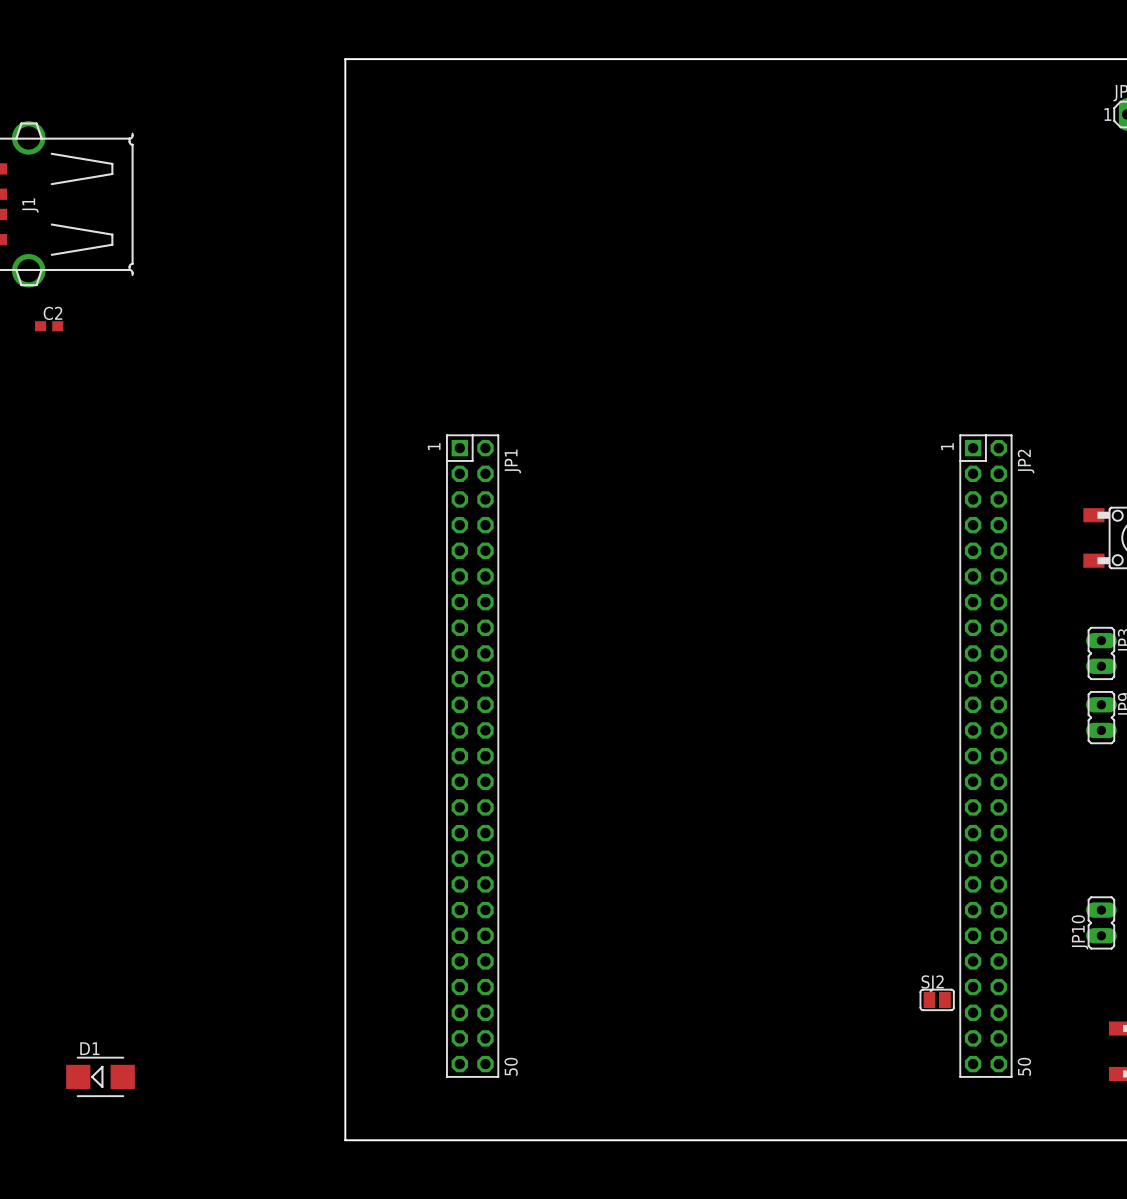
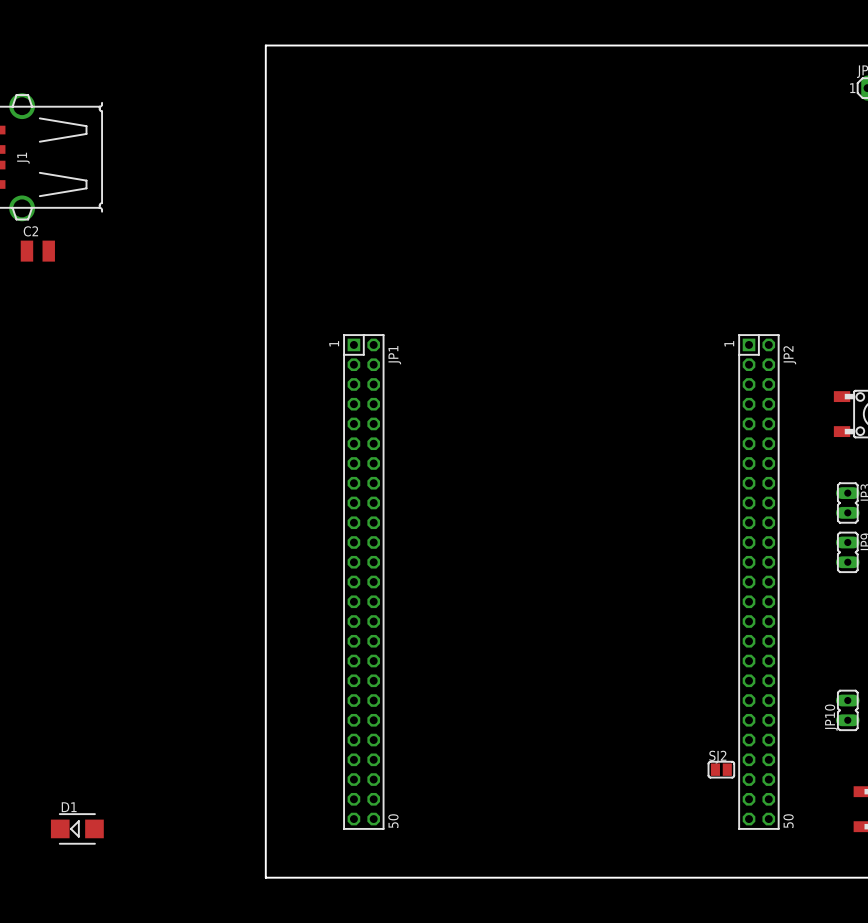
C2 footprint: [35, 321, 64, 332] -> [20, 240, 55, 262]

